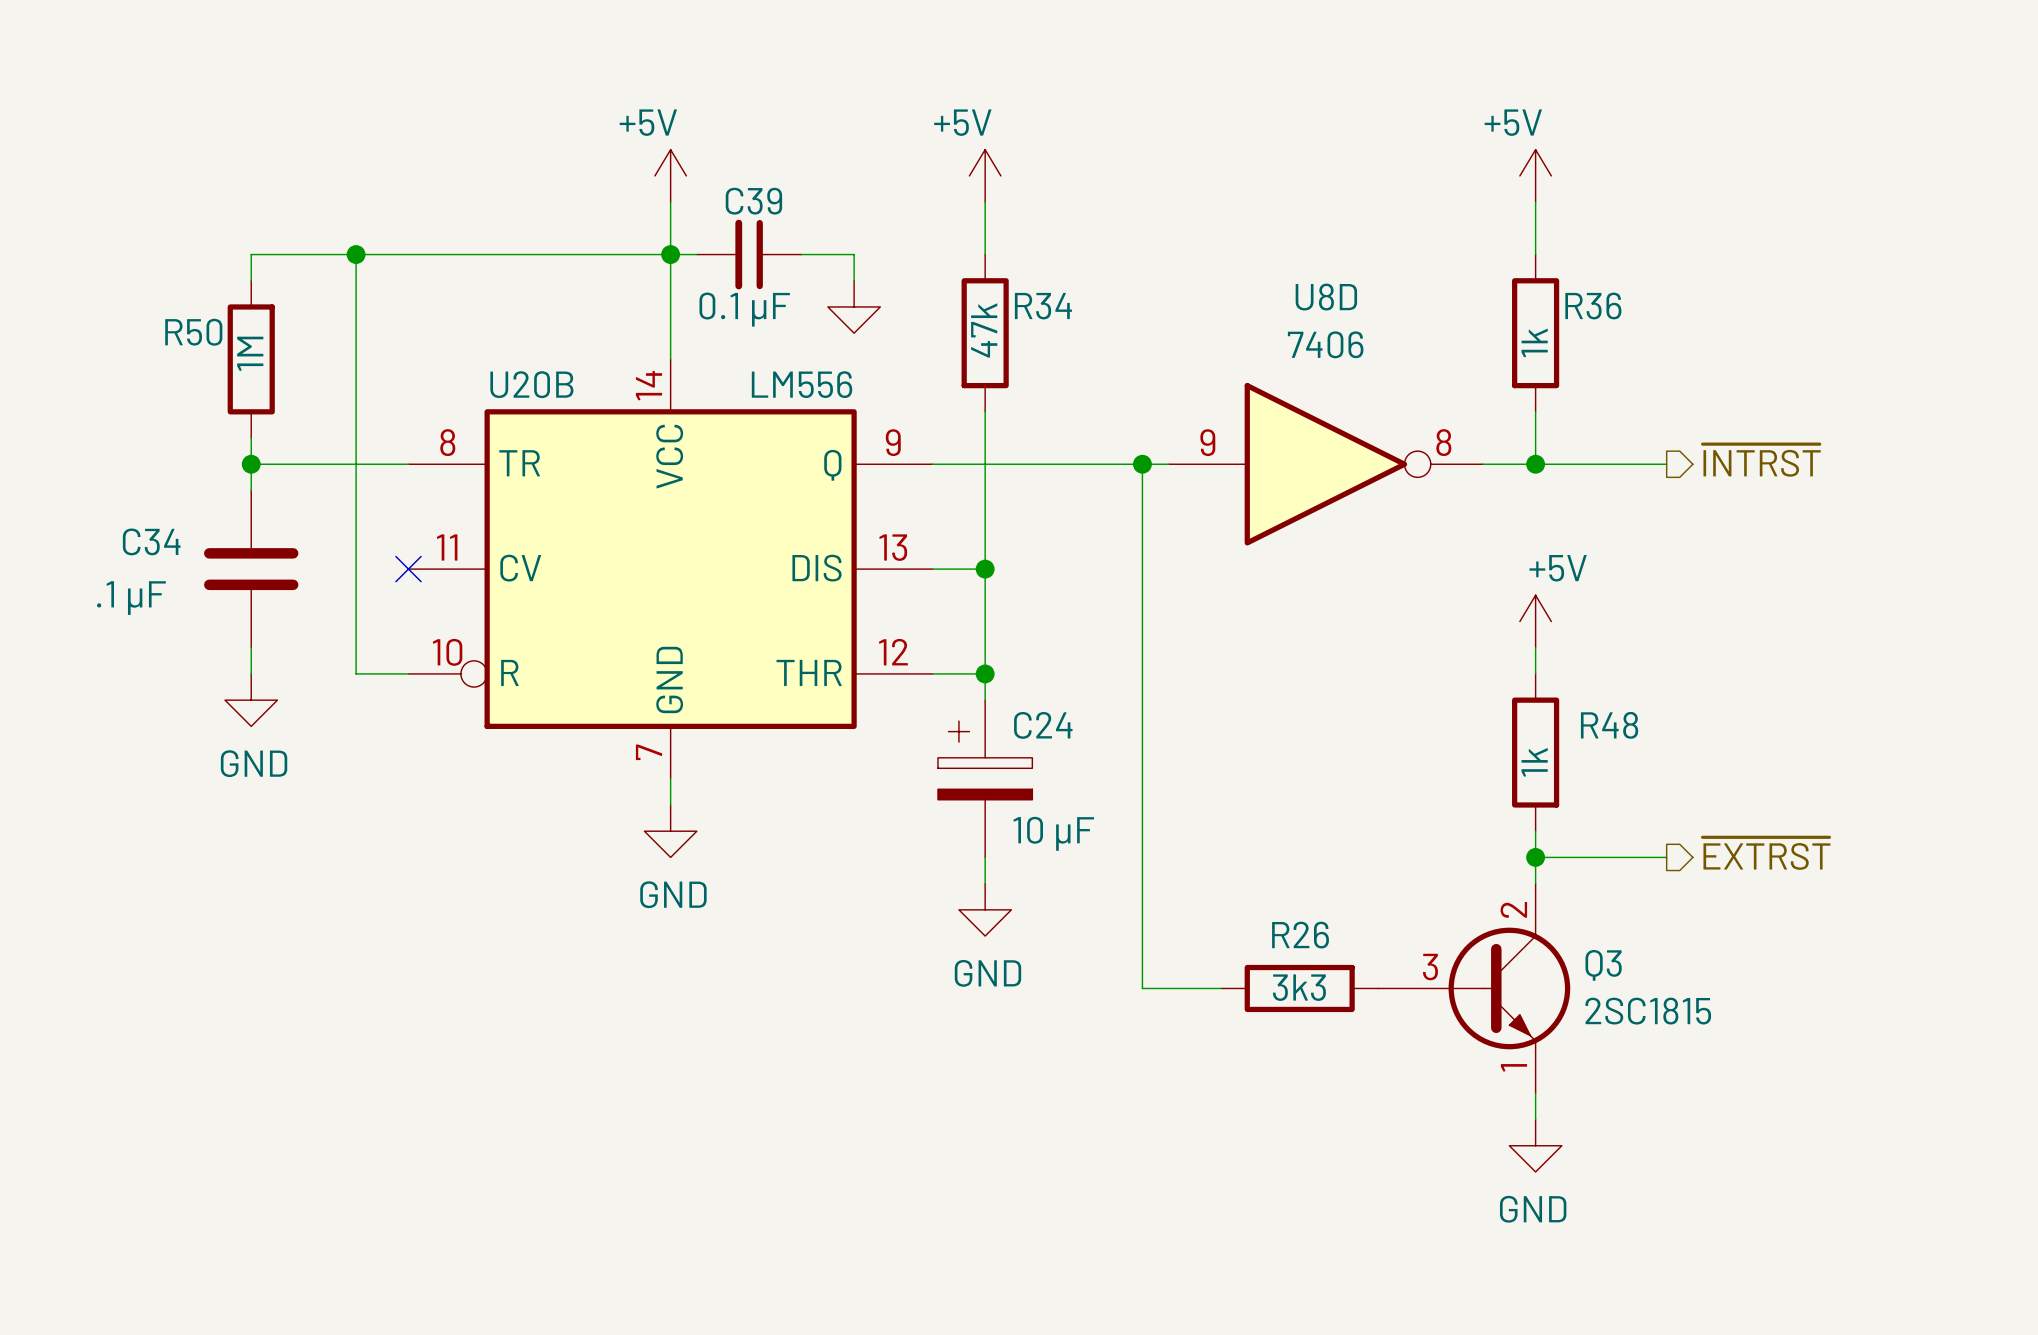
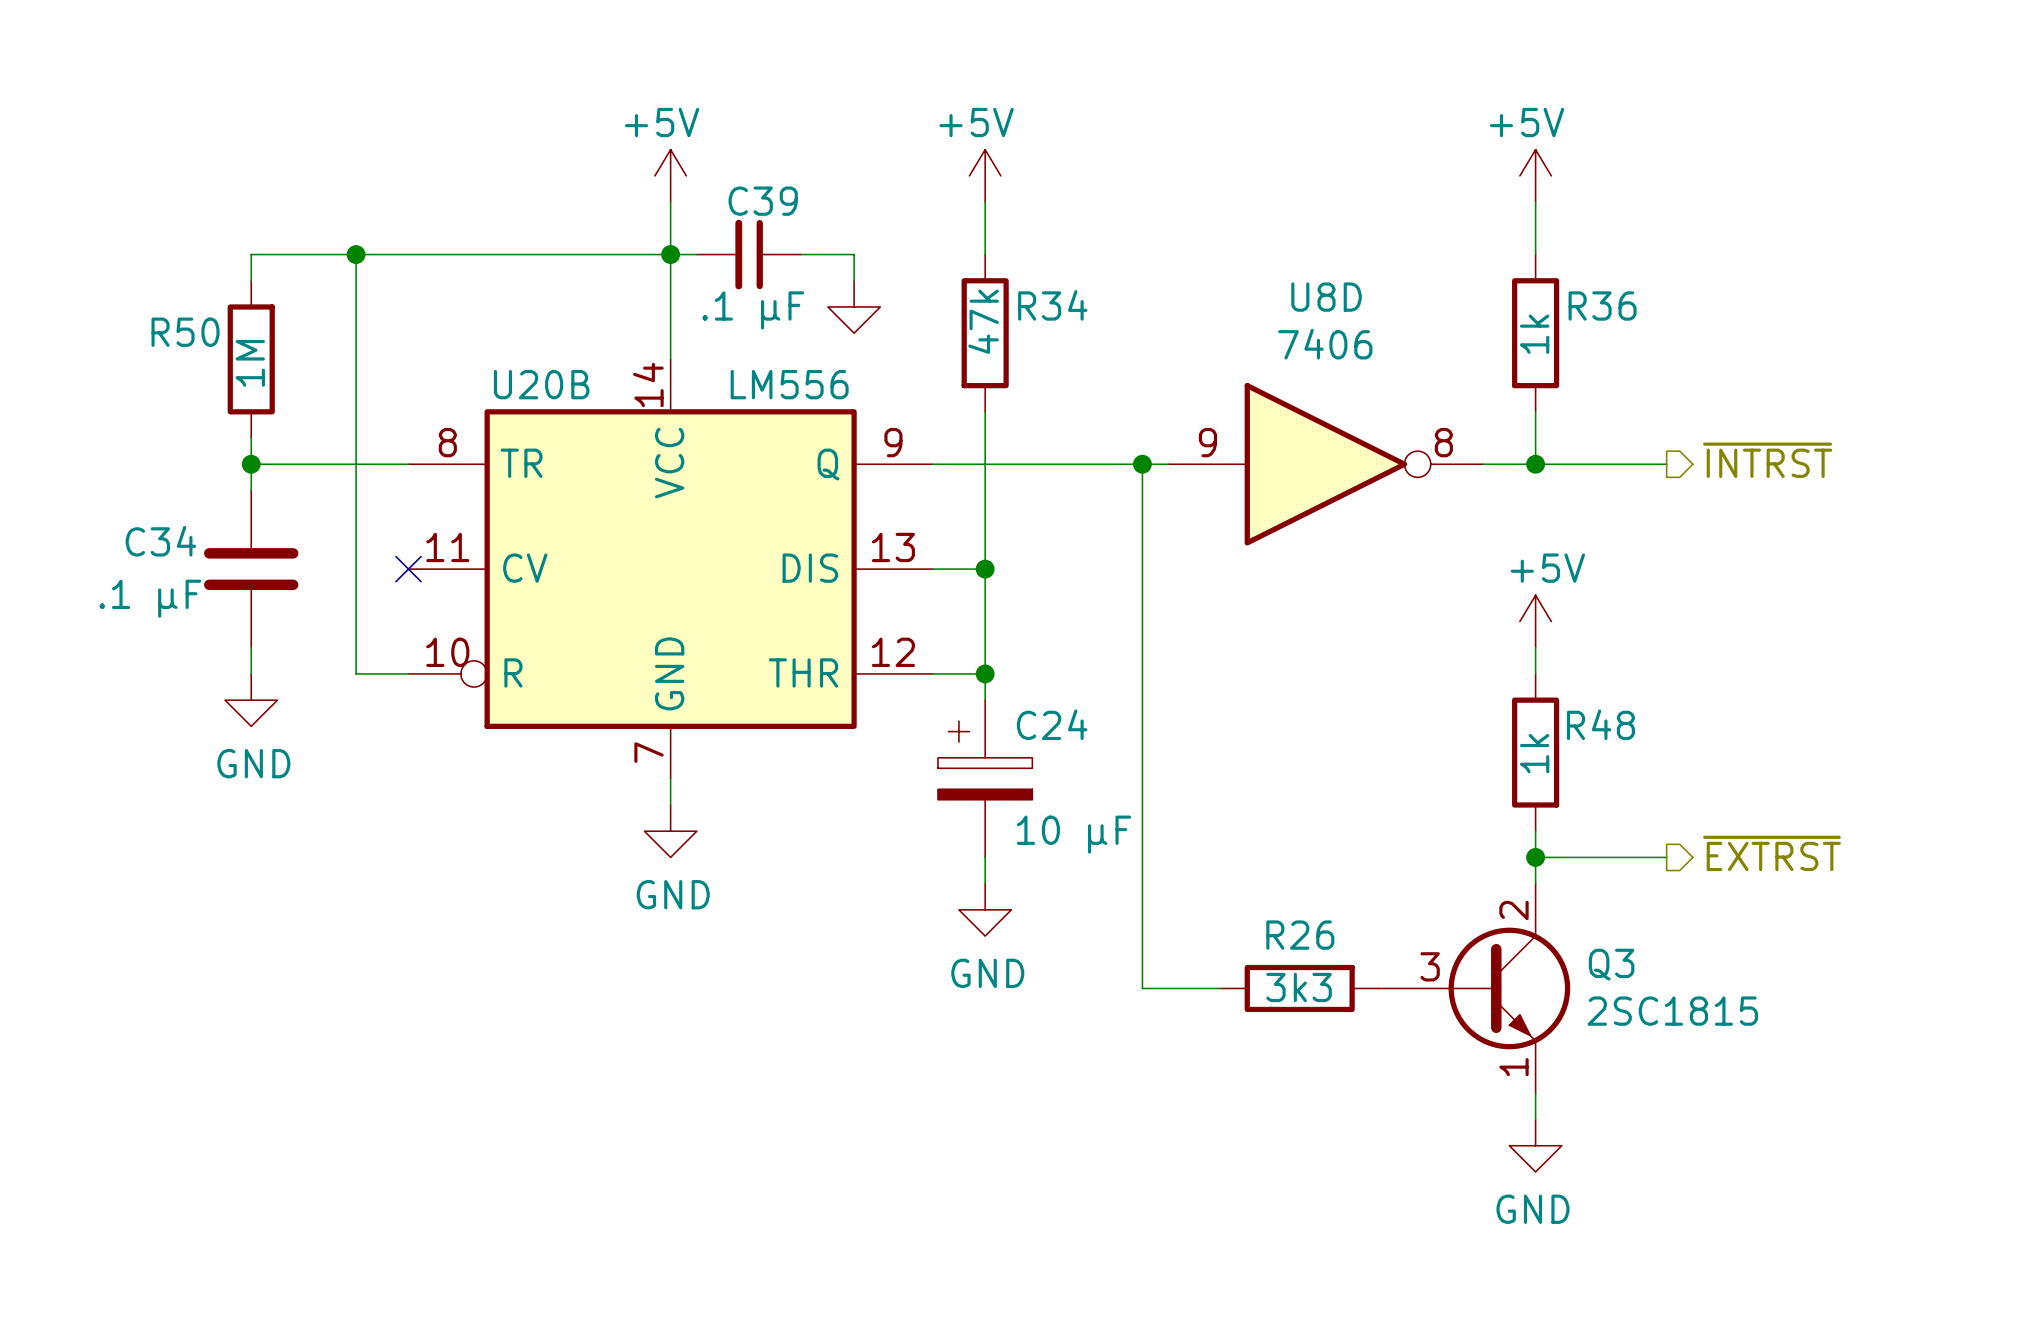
C39 value: 0.1 μF (744, 309) -> .1 μF (753, 310)

